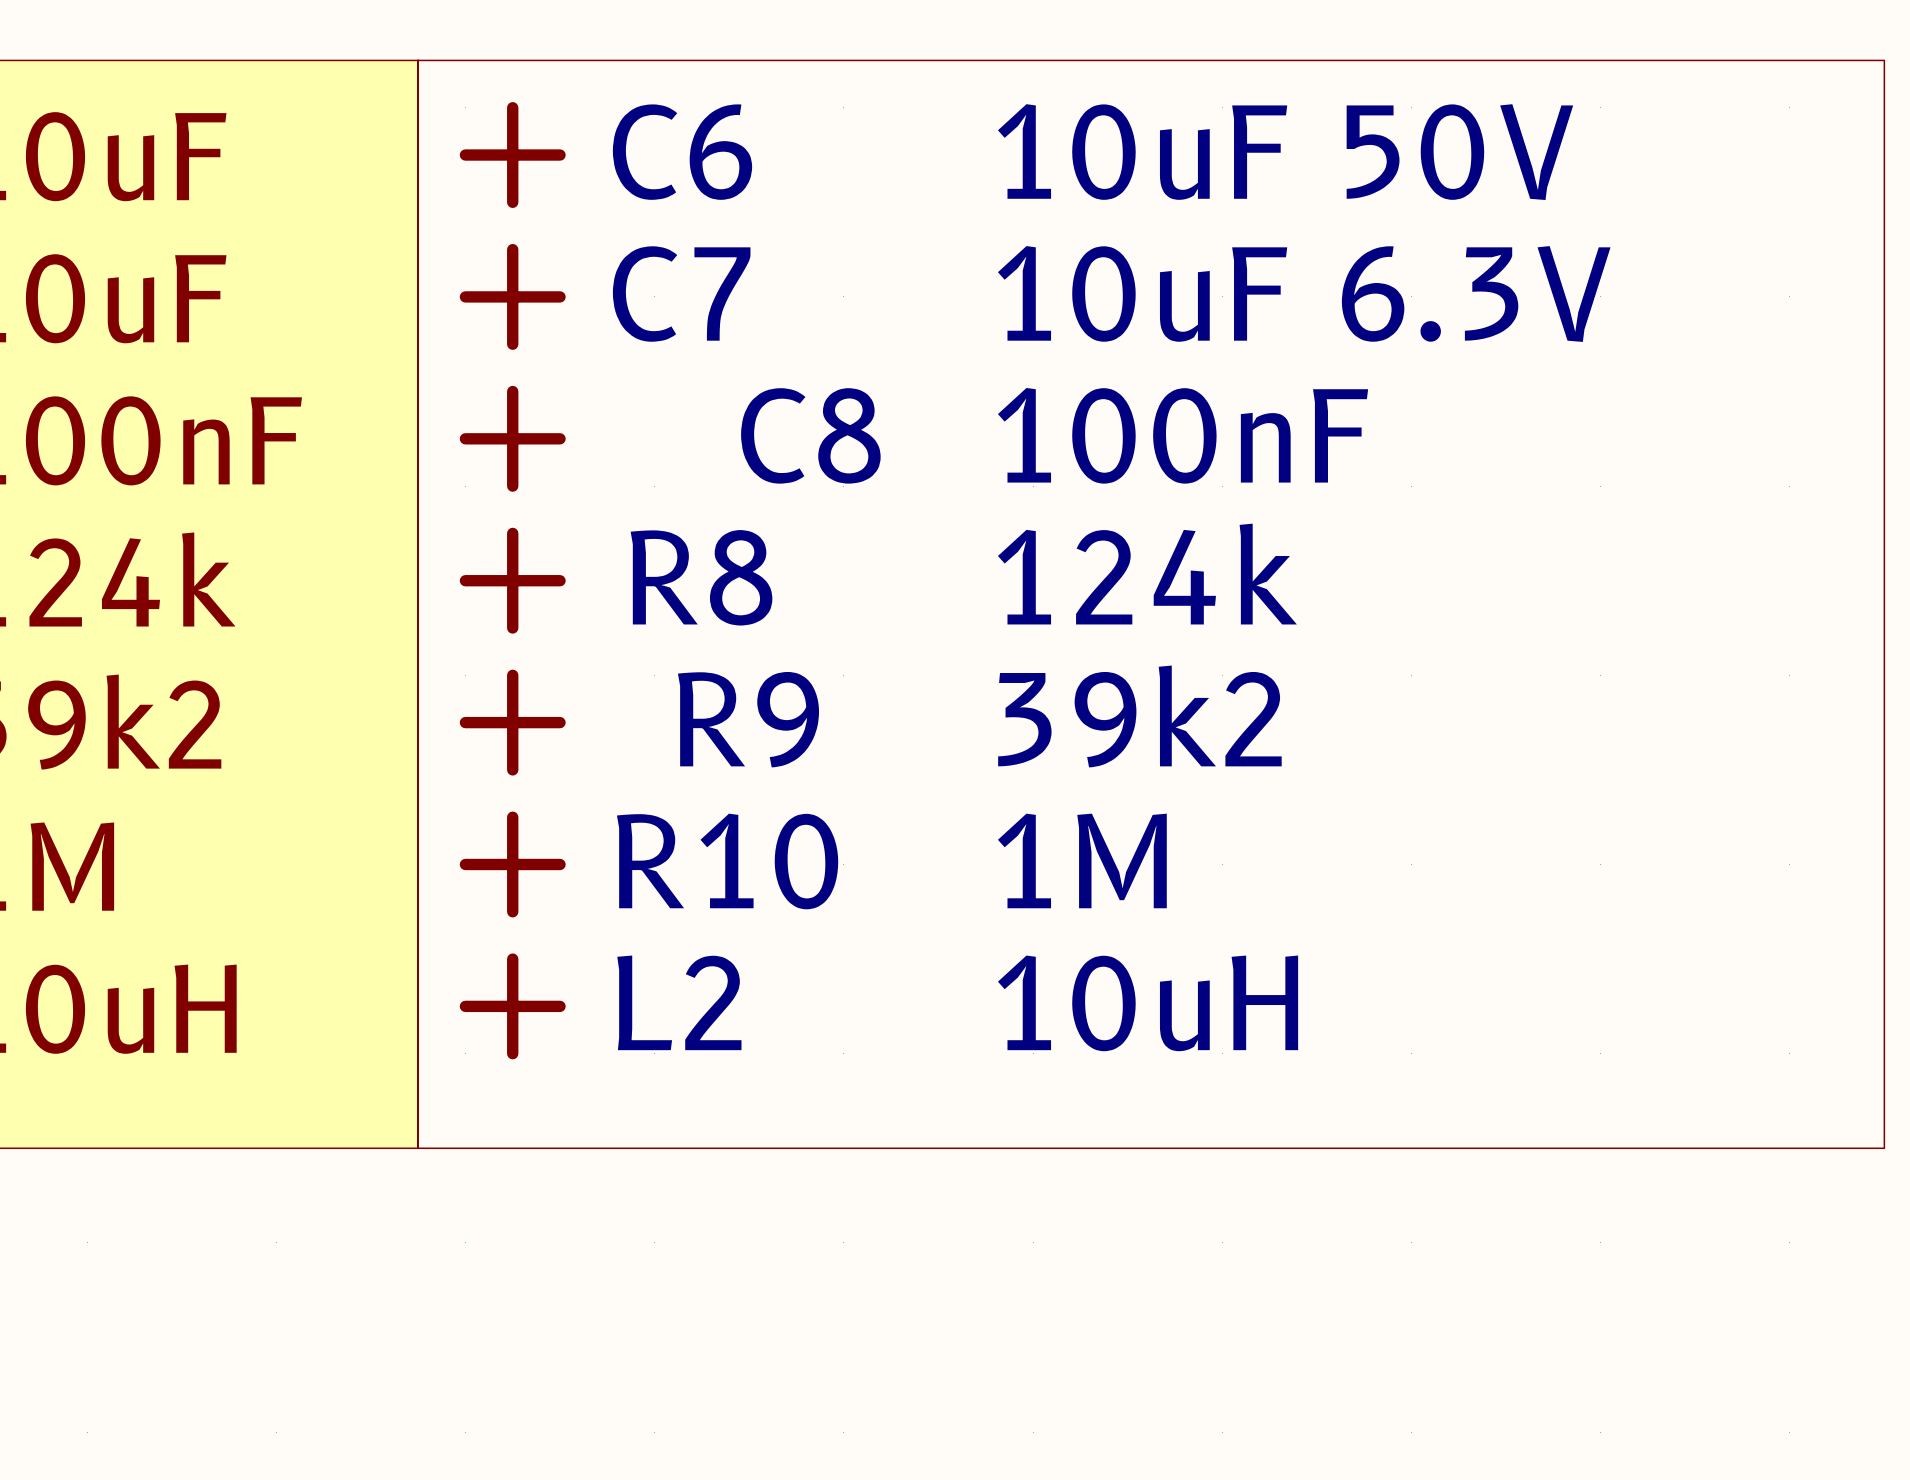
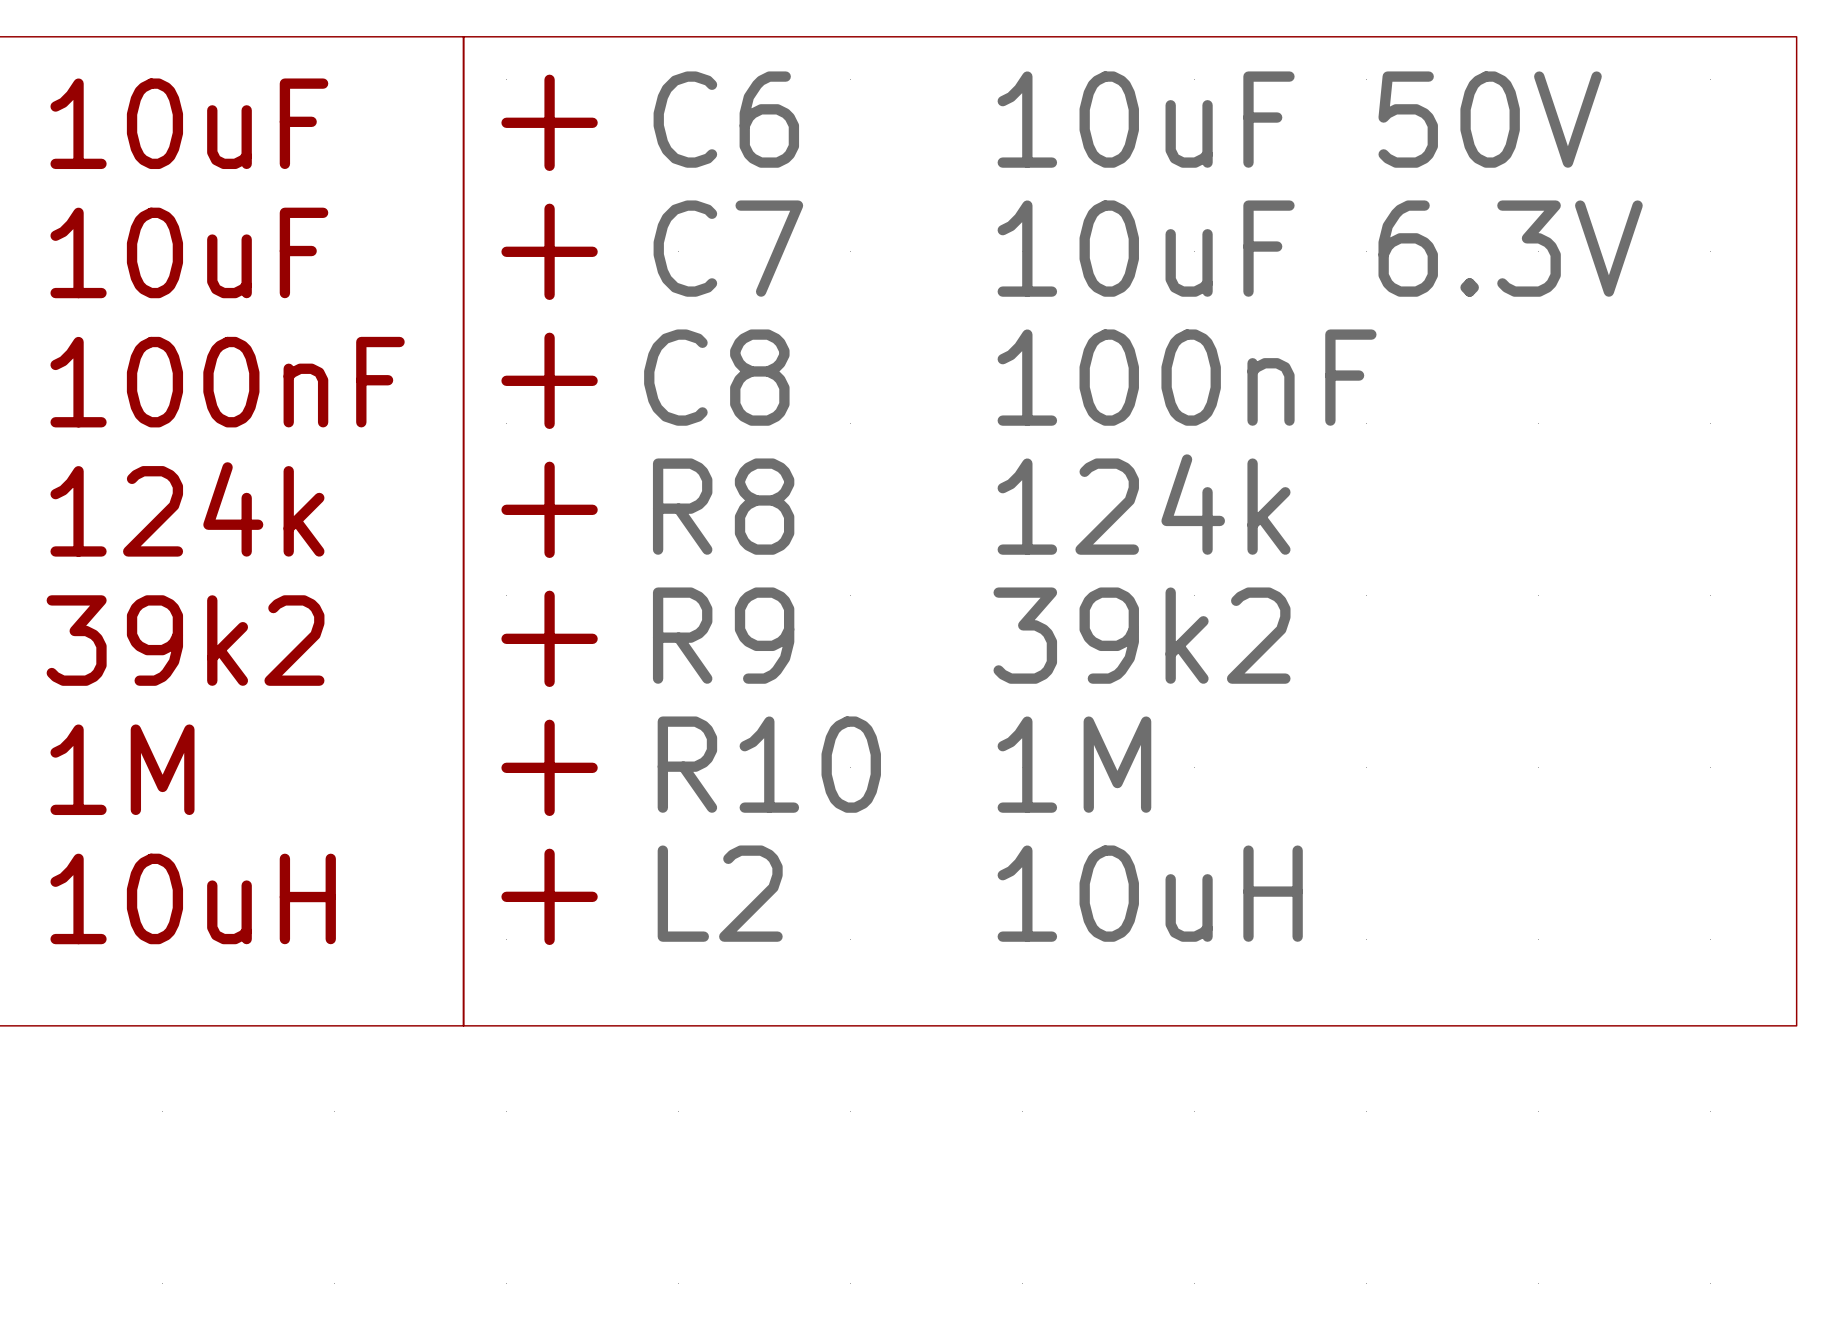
C8 name position: C8 (810, 435) -> C8 (716, 377)
R9 name position: R9 (748, 719) -> R9 (723, 635)

